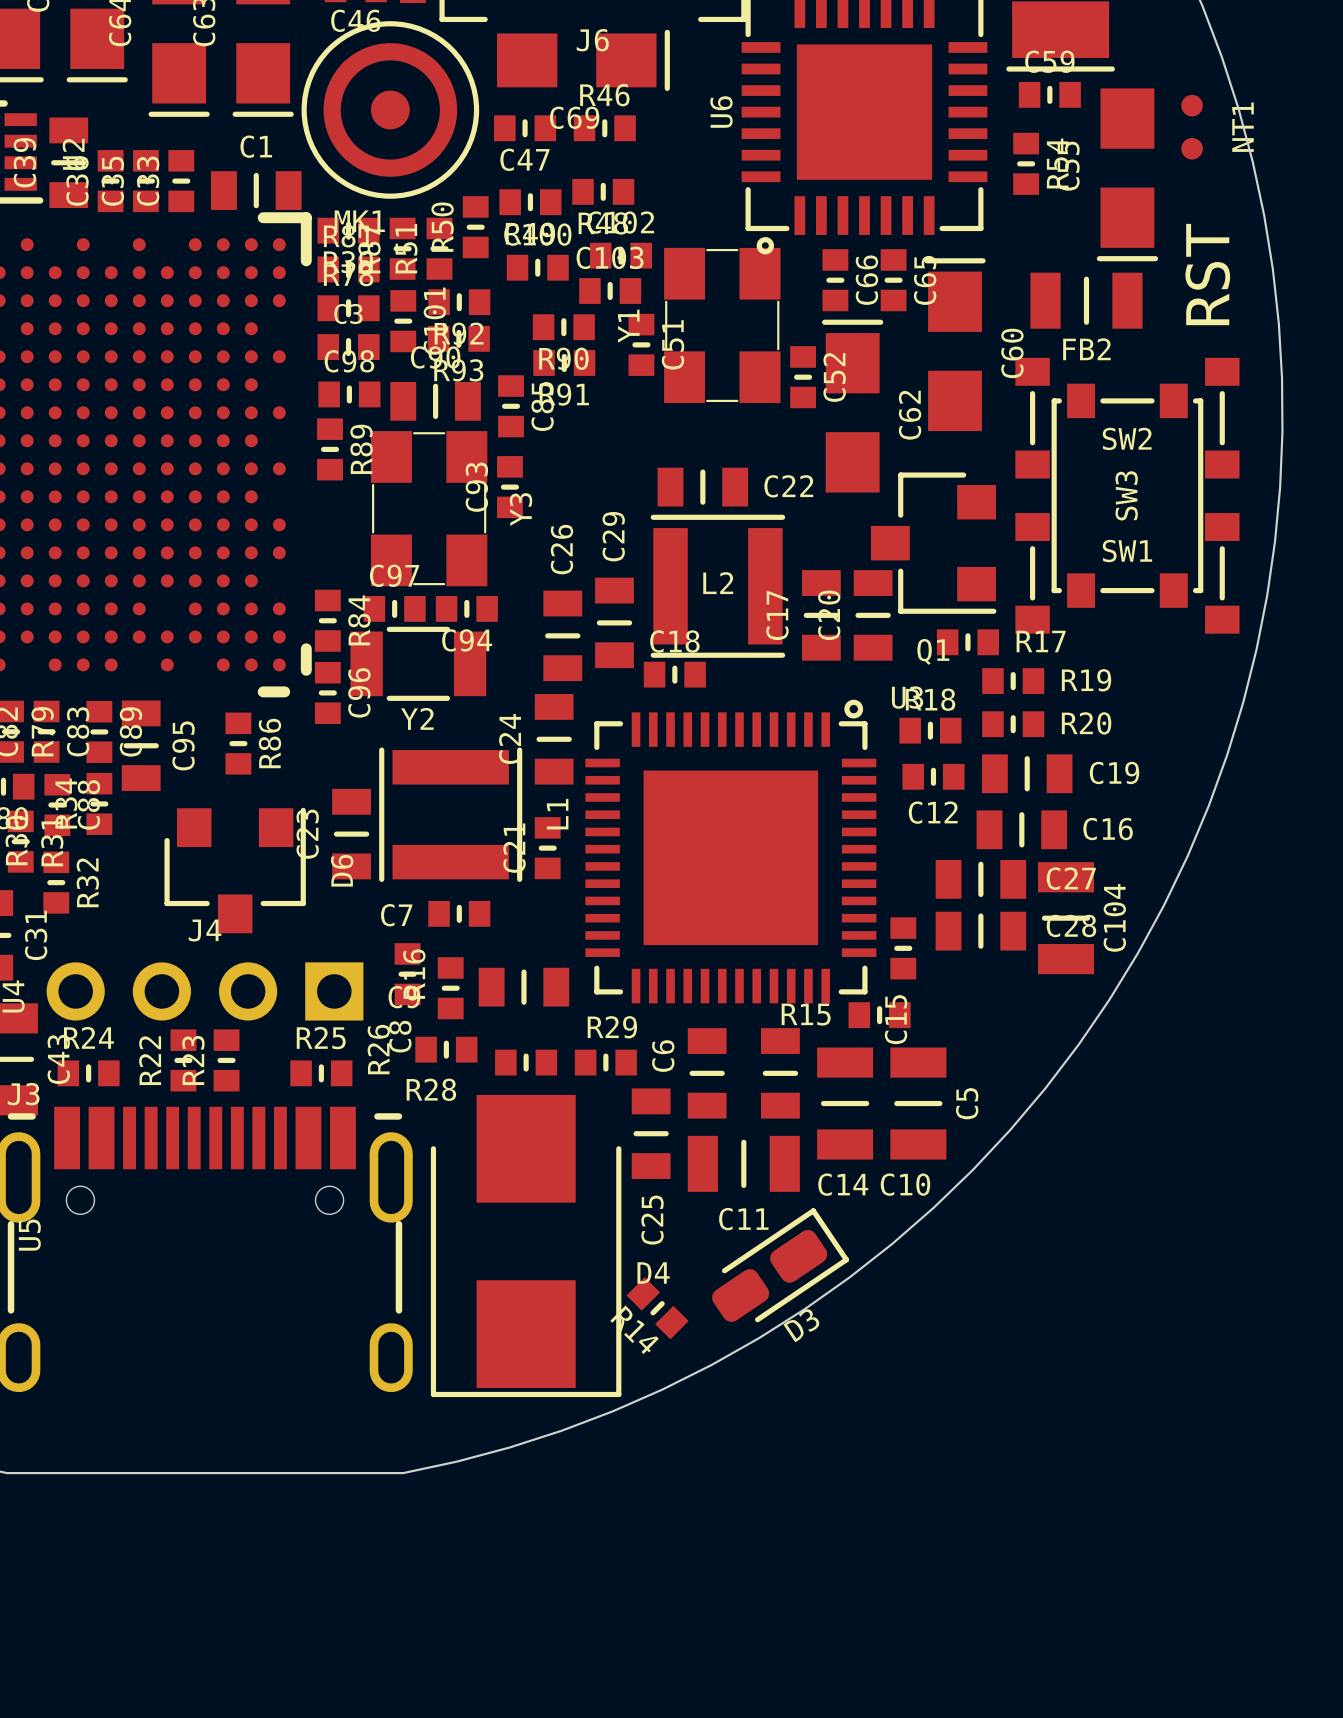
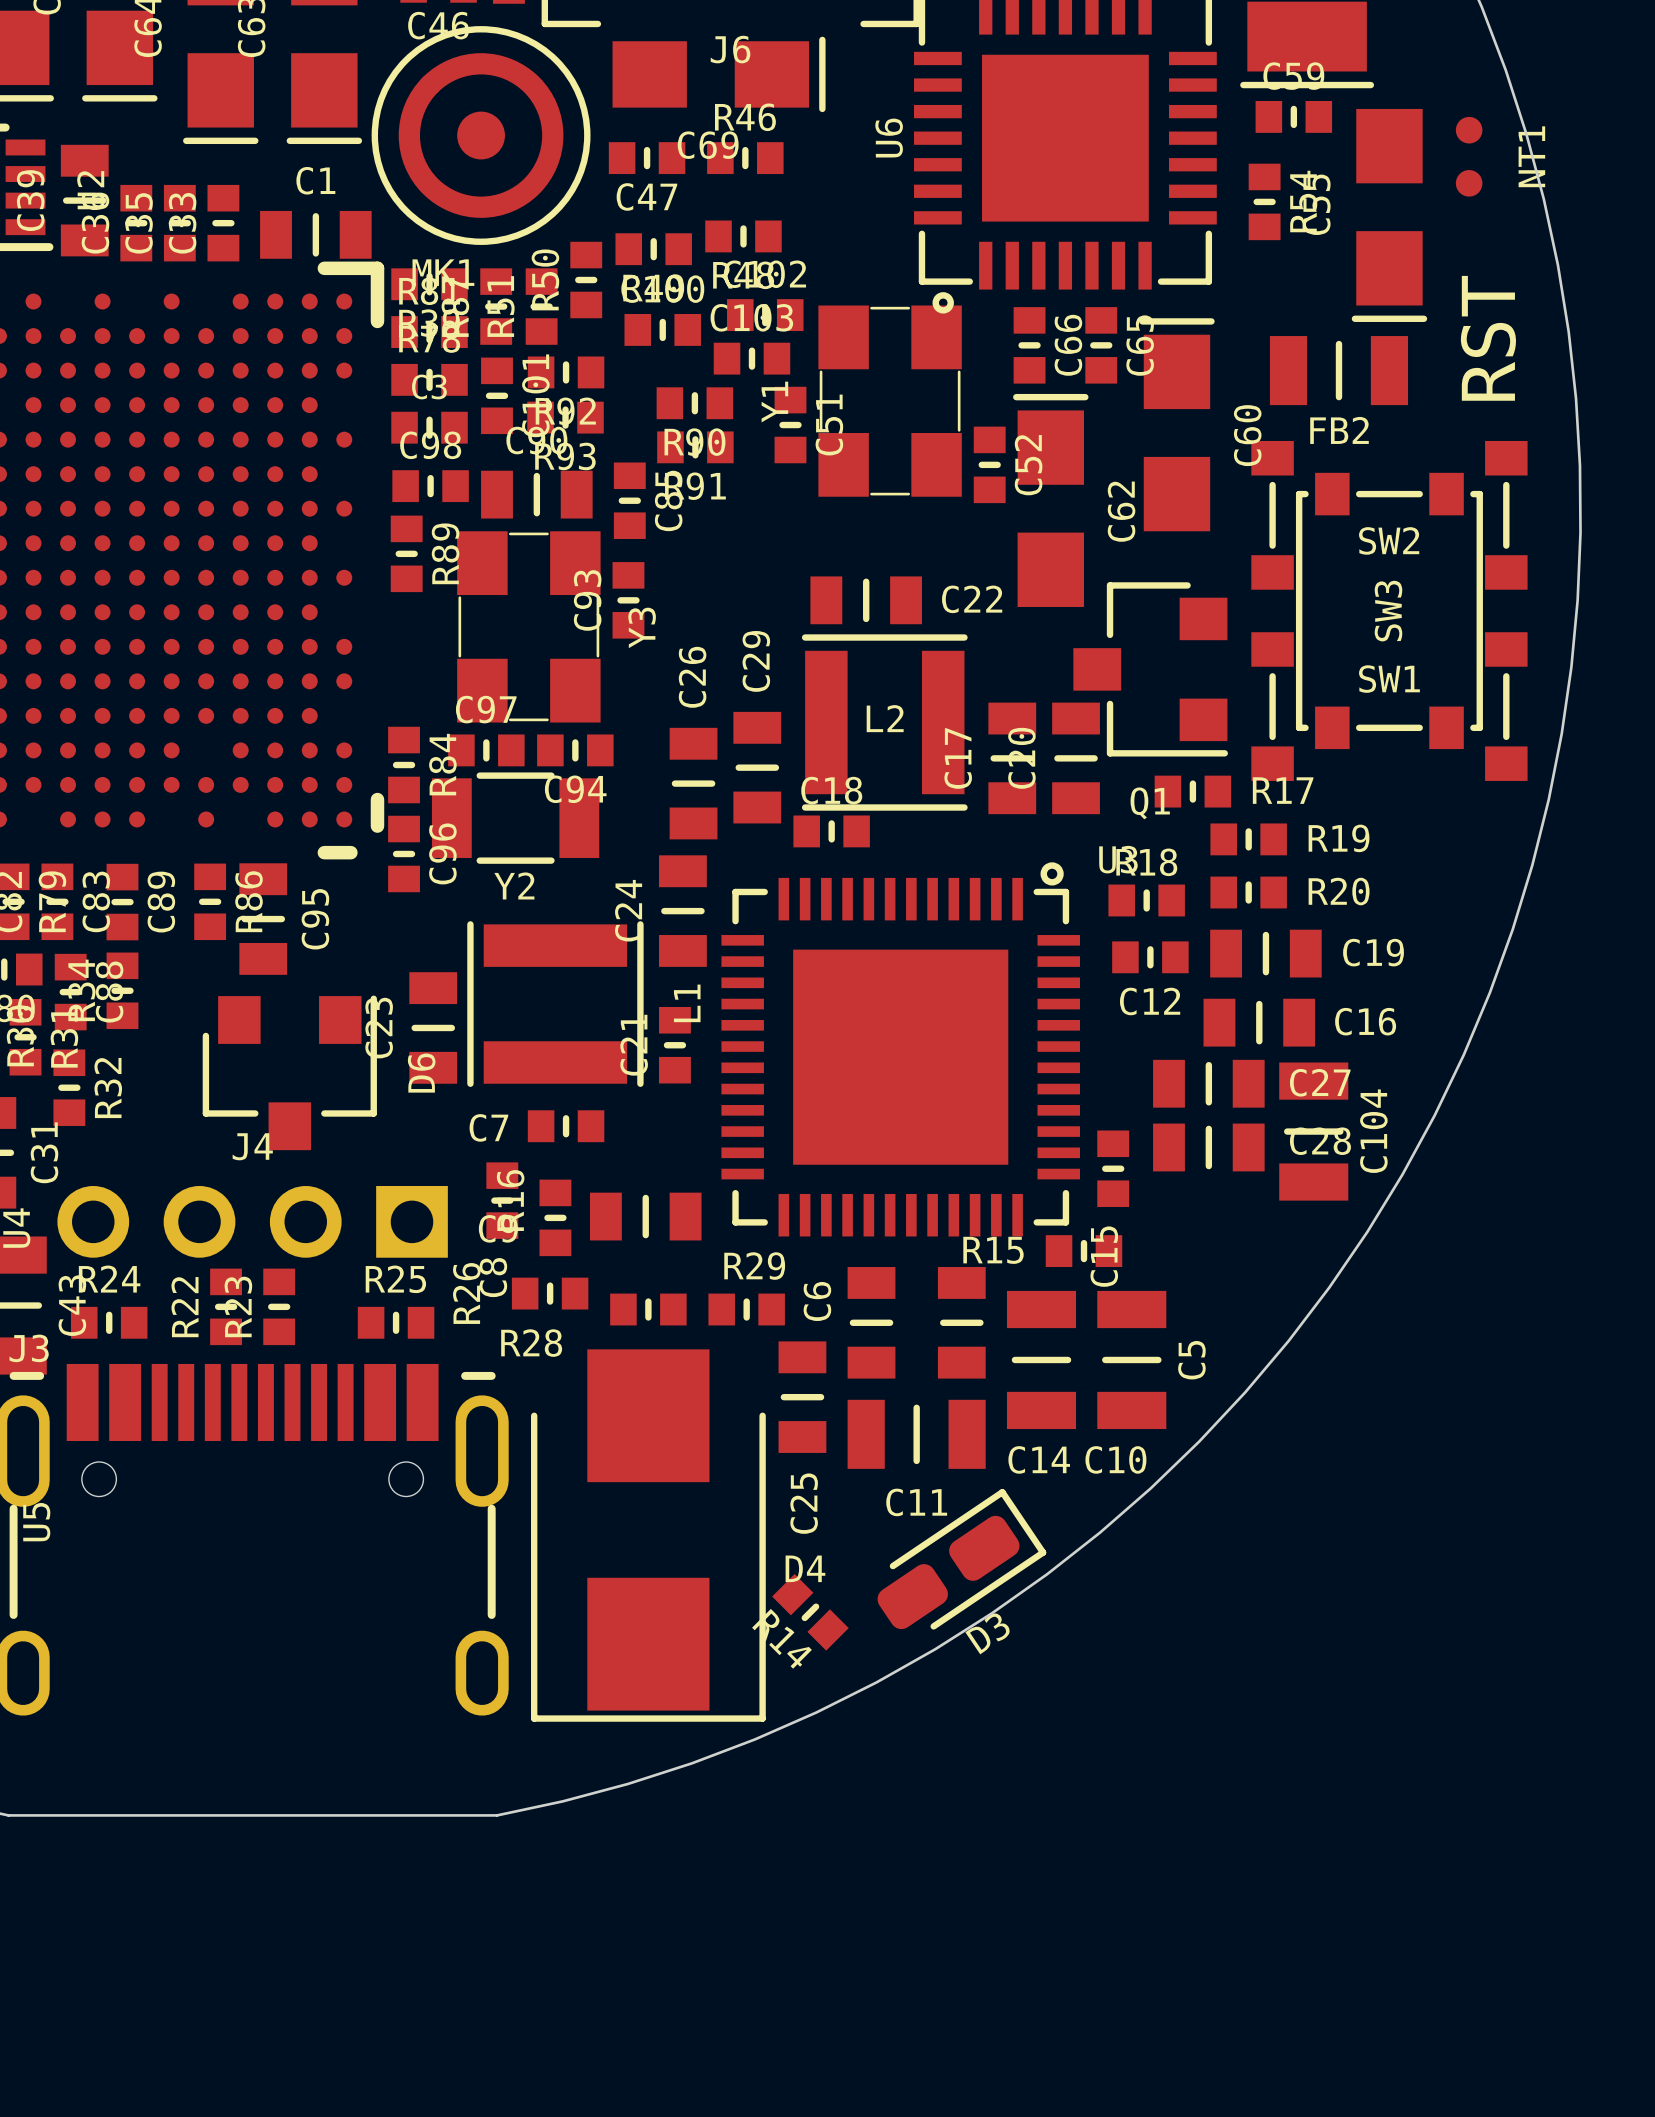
R86 position: (238, 743) -> (210, 901)
C95 position: (141, 745) -> (263, 919)

